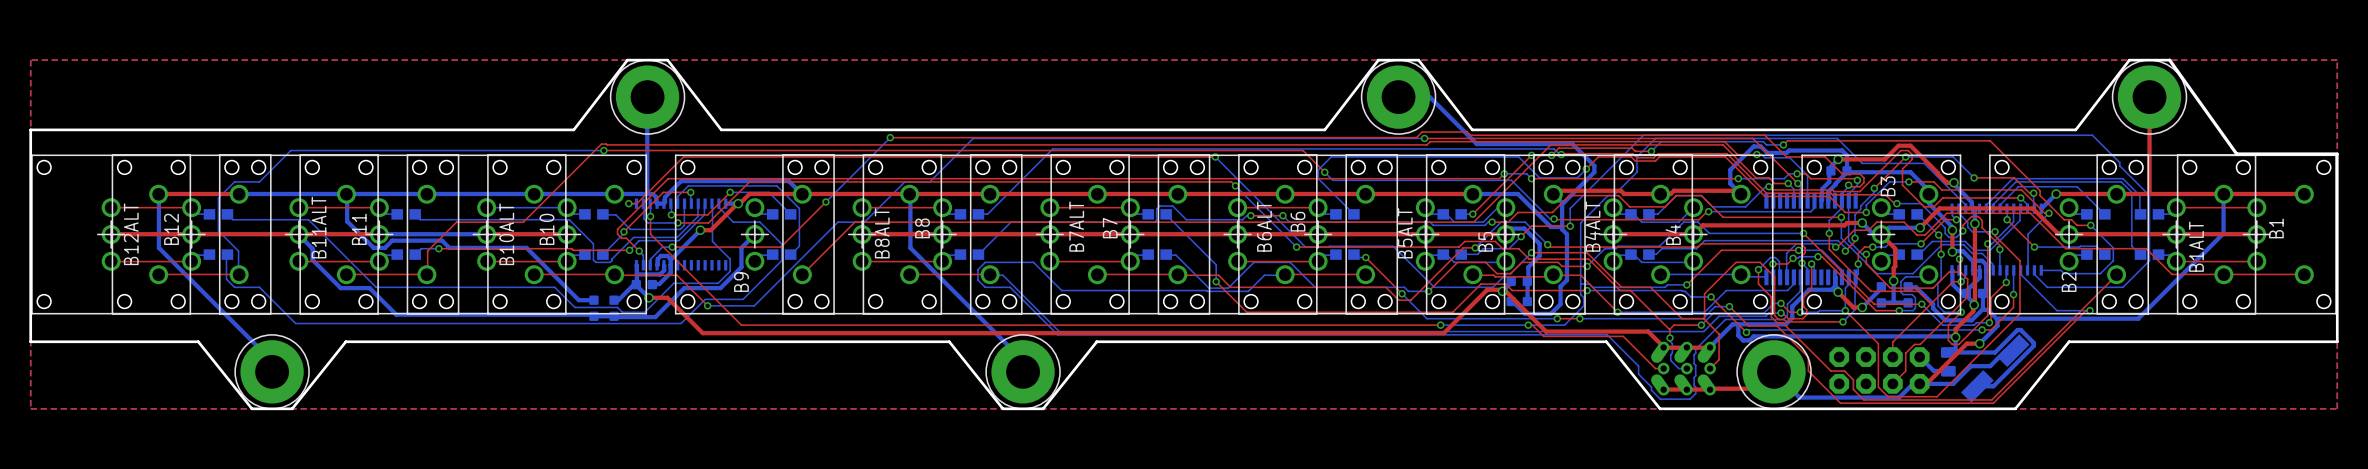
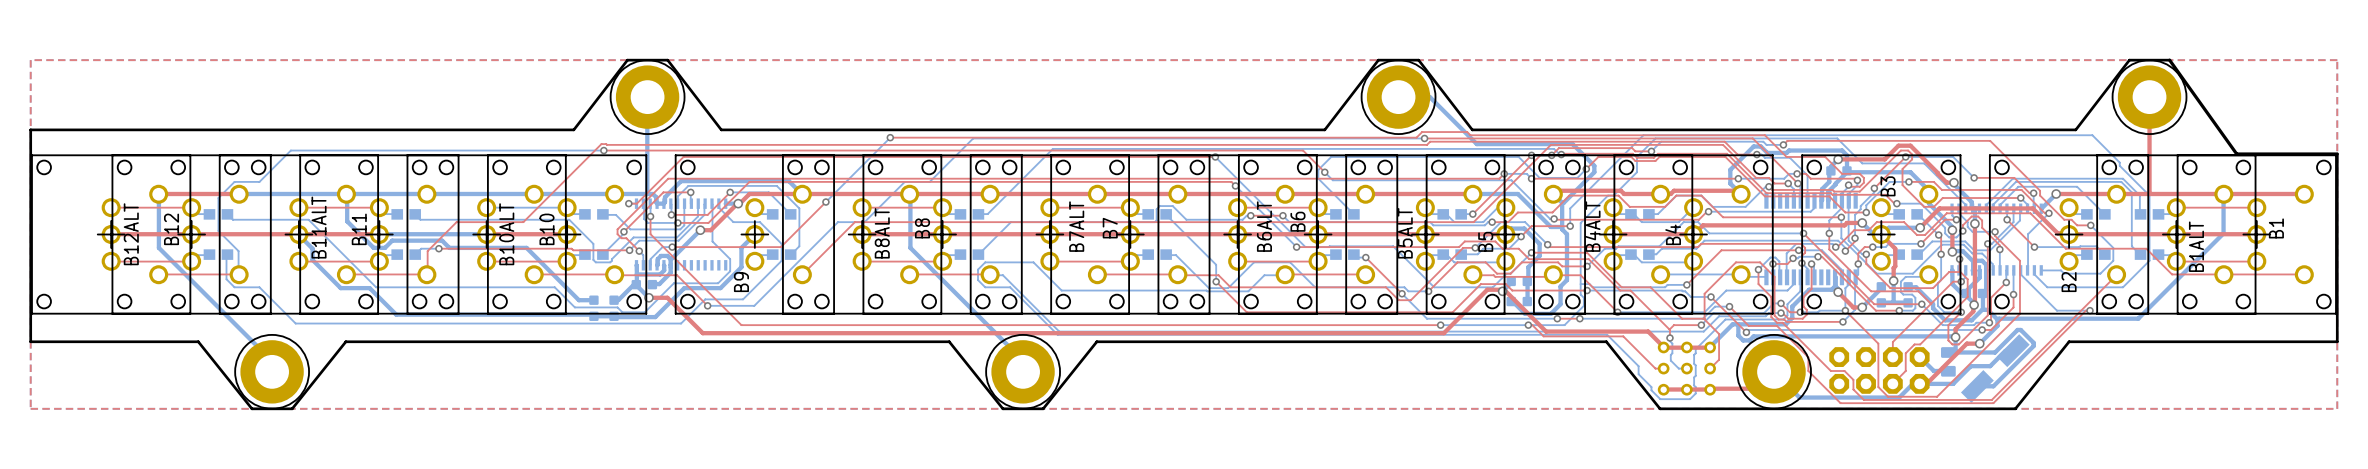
part footprint: [1651, 341, 1716, 396] -> [1657, 341, 1716, 396]

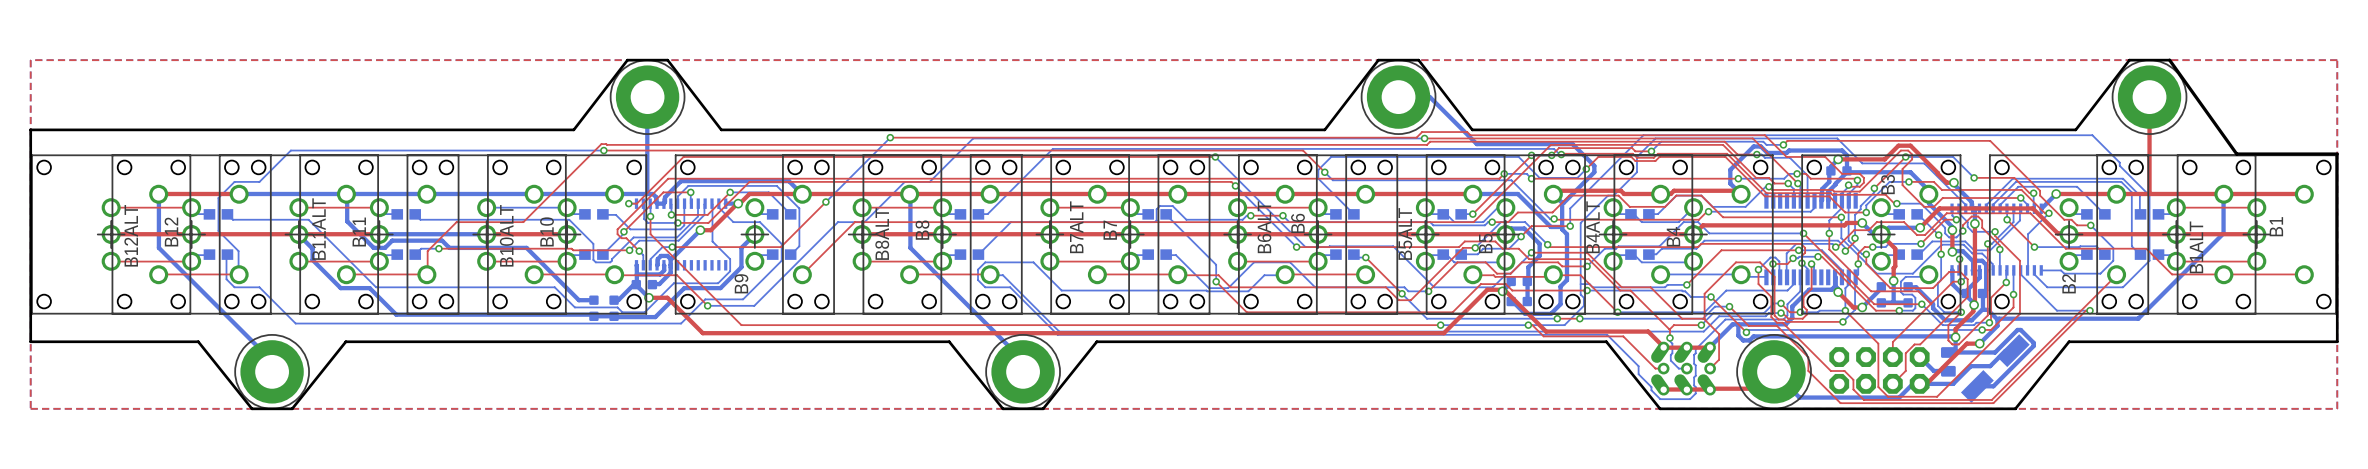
part footprint: [1657, 341, 1716, 396] -> [1651, 341, 1716, 396]

